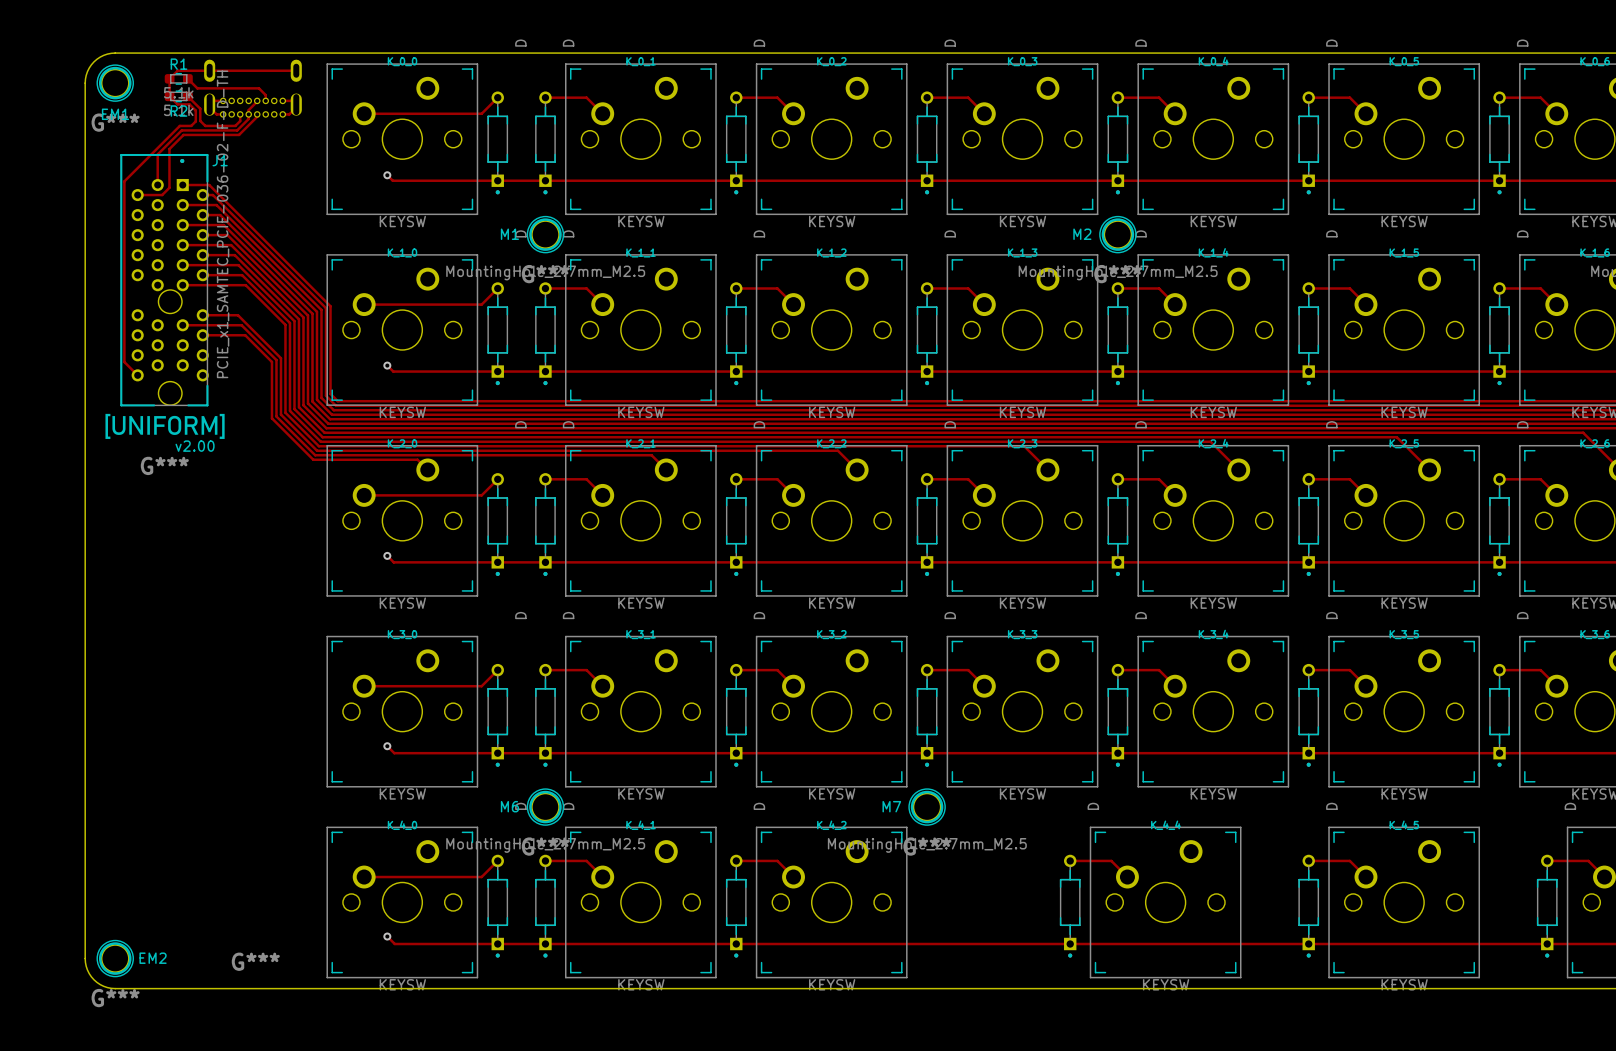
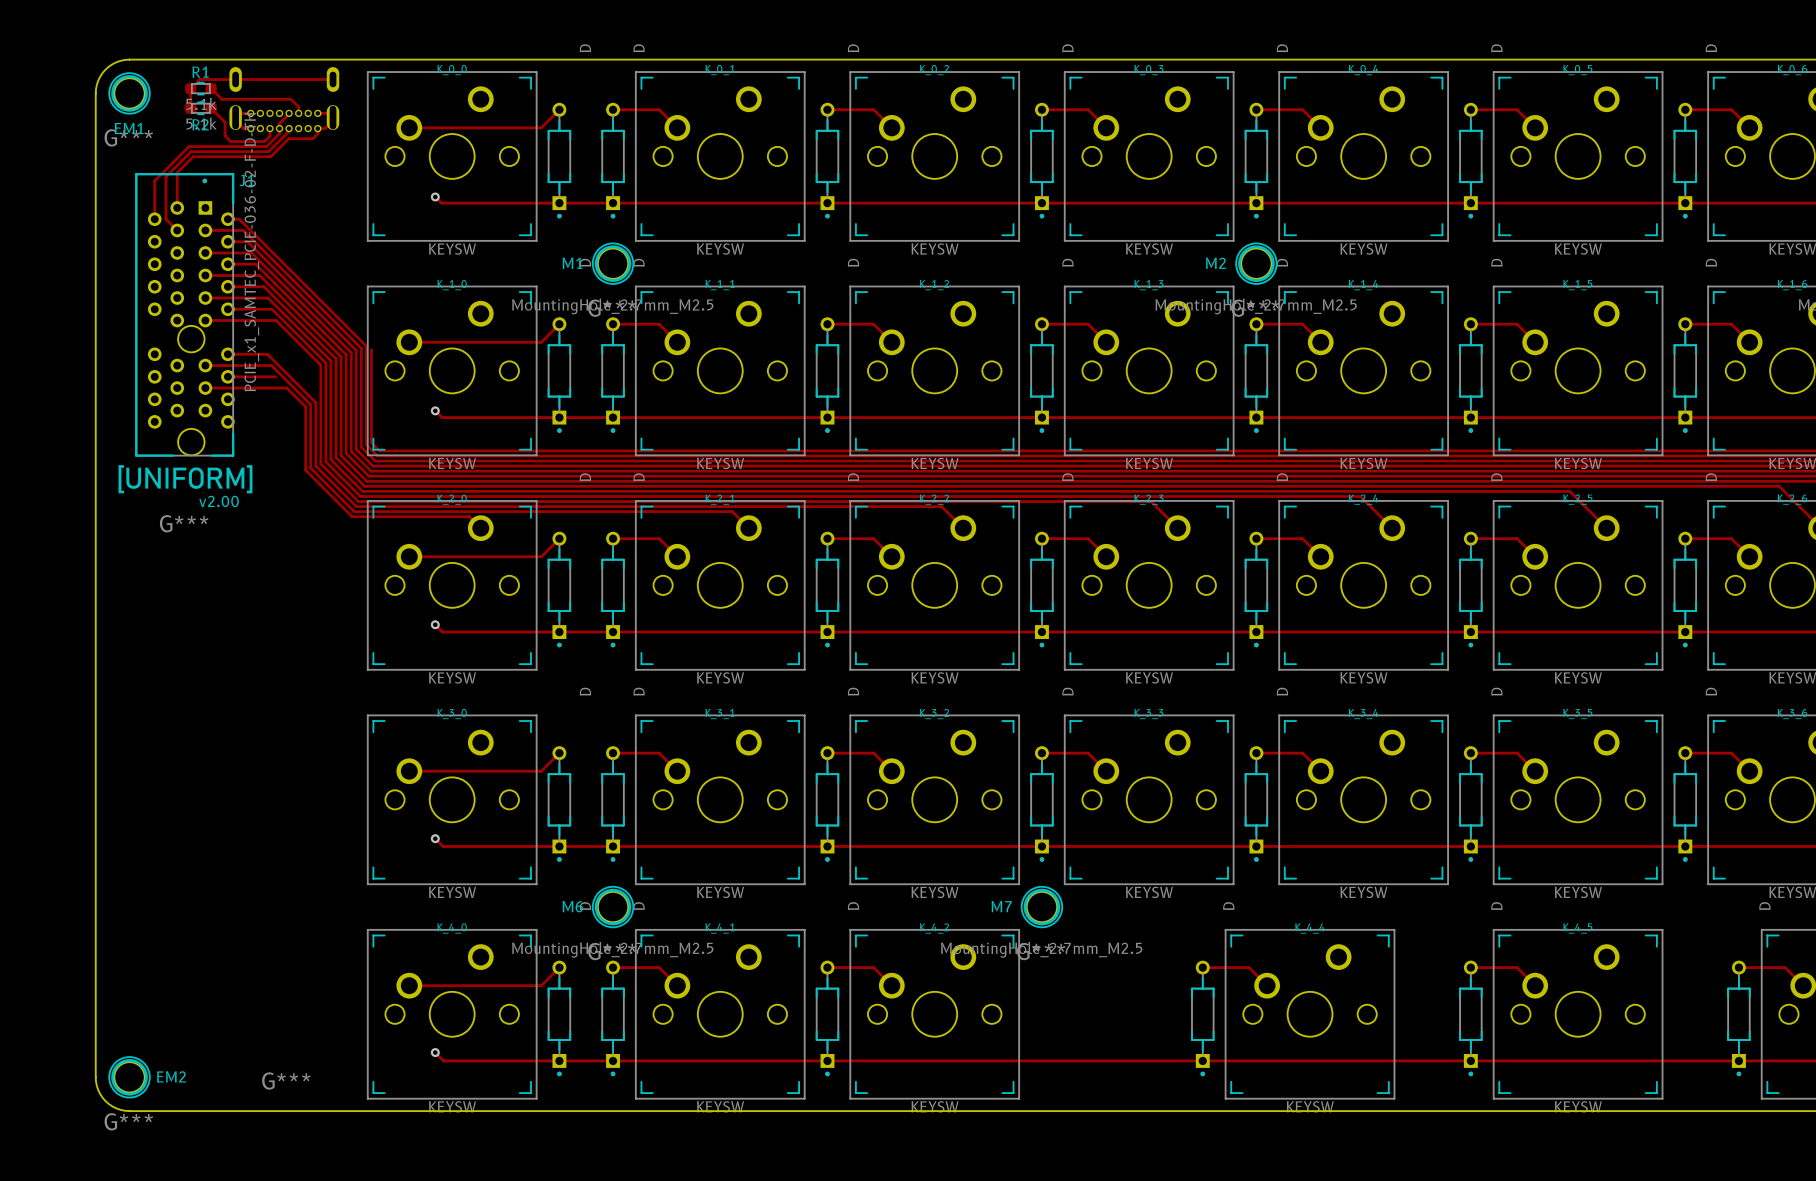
track: (170, 96) (177, 104) (189, 104) (195, 110) (195, 121) (191, 125) (179, 125) (124, 181) (124, 362) (137, 375) -> none
track: (181, 130) (157, 154) -> (317, 128) (317, 133) (312, 138) (288, 138) (270, 156) (193, 156) (177, 173)
track: (183, 134) (169, 149) (169, 187) (162, 195) (137, 195) -> (204, 146) (189, 146) (154, 180) (154, 219)
track: none -> (206, 151) (191, 151) (166, 176) (166, 219) (177, 230)
track: (182, 185) (209, 185) (330, 306) (330, 311) -> none
track: (245, 335) (255, 345) -> (205, 388) (286, 388)

